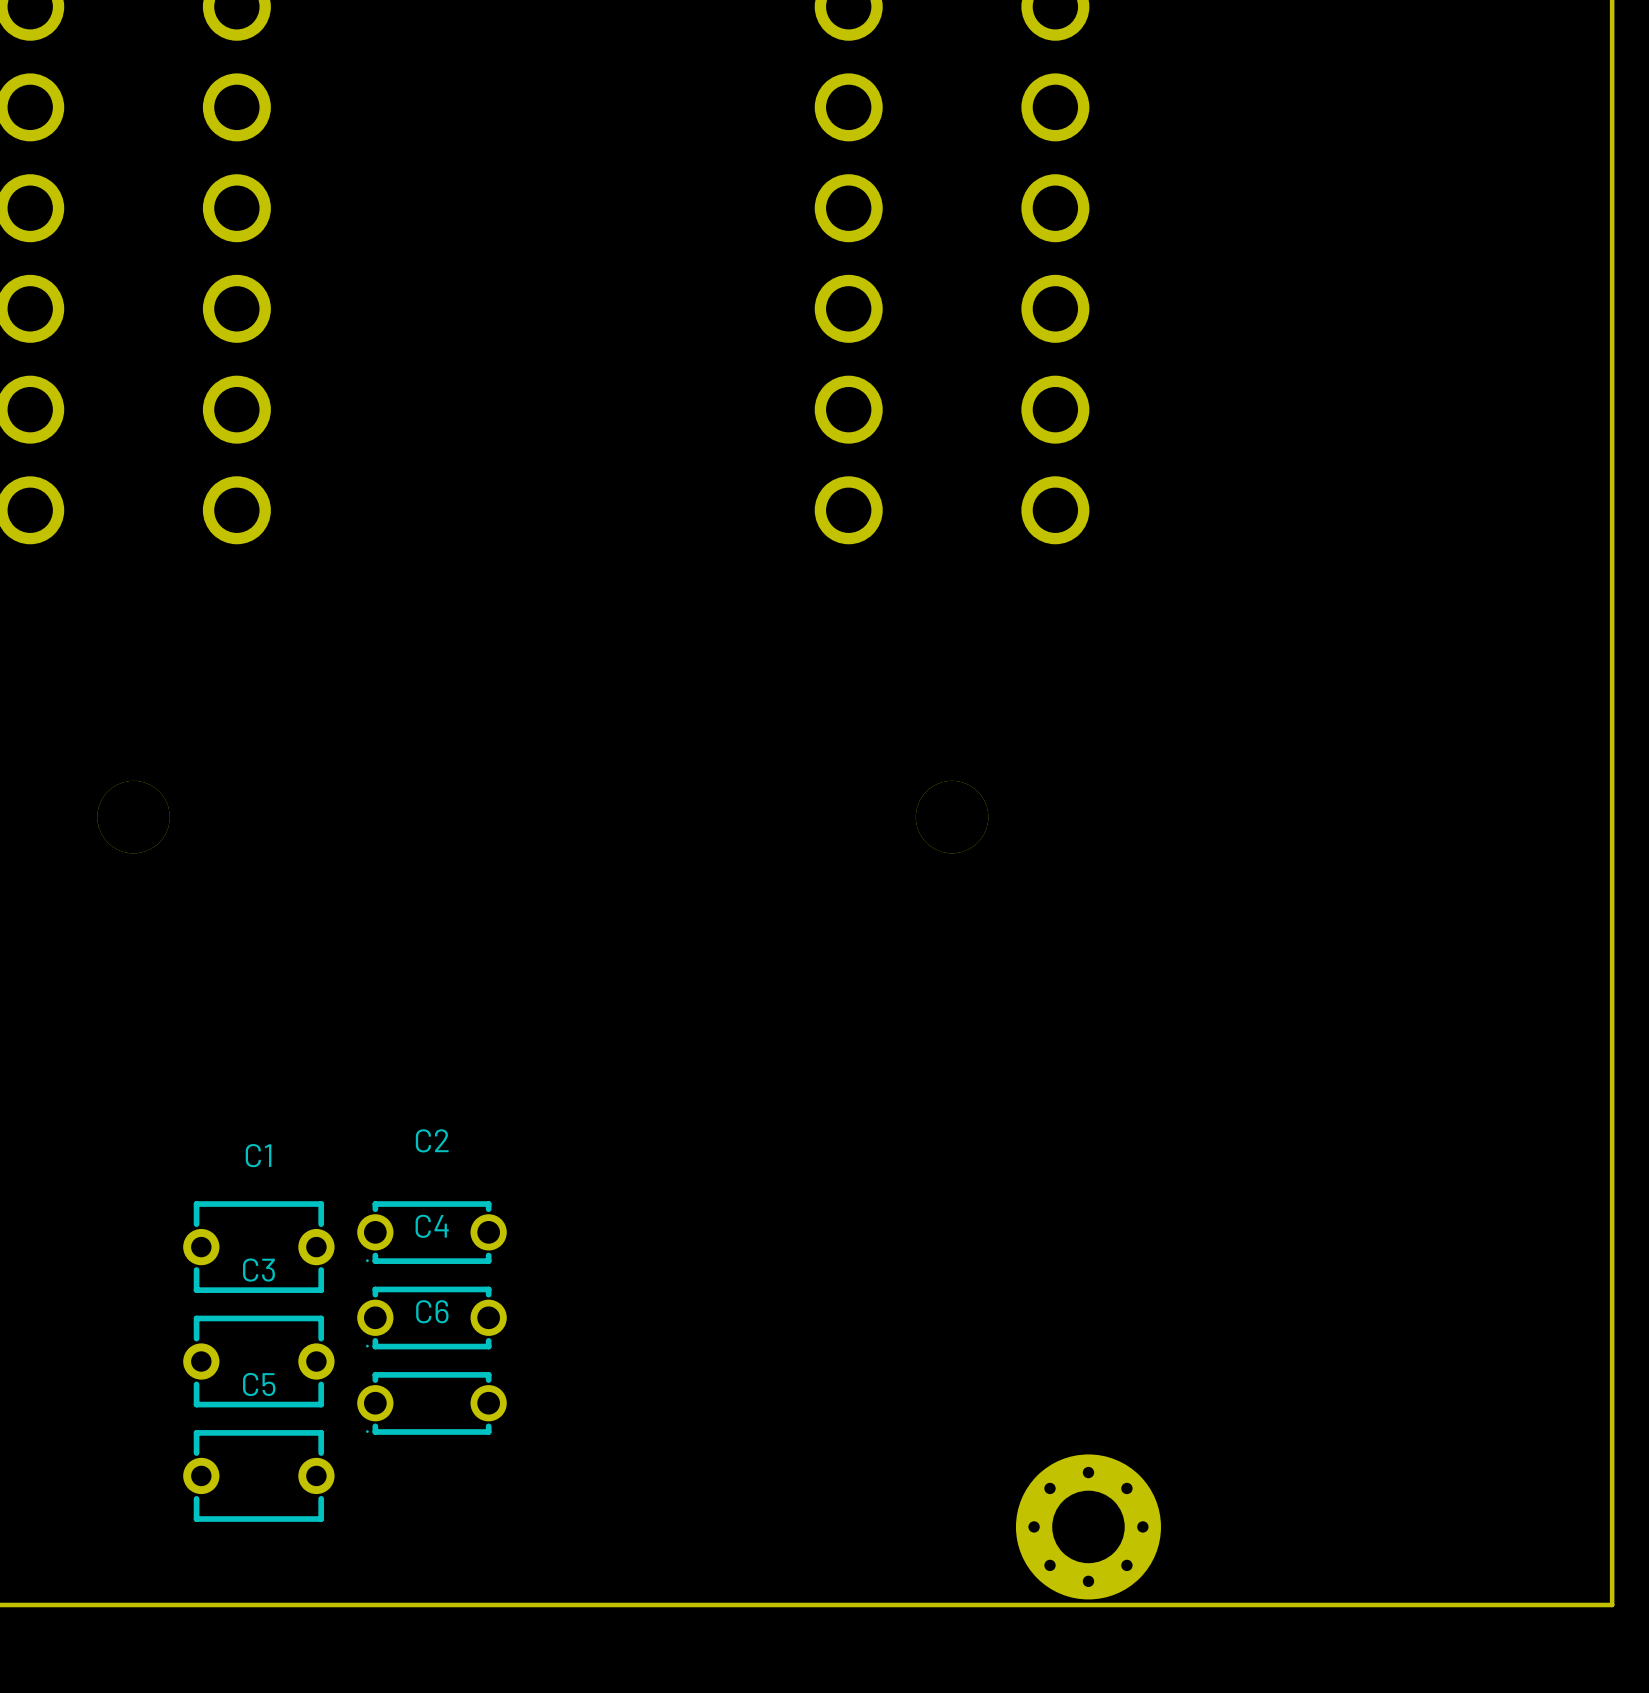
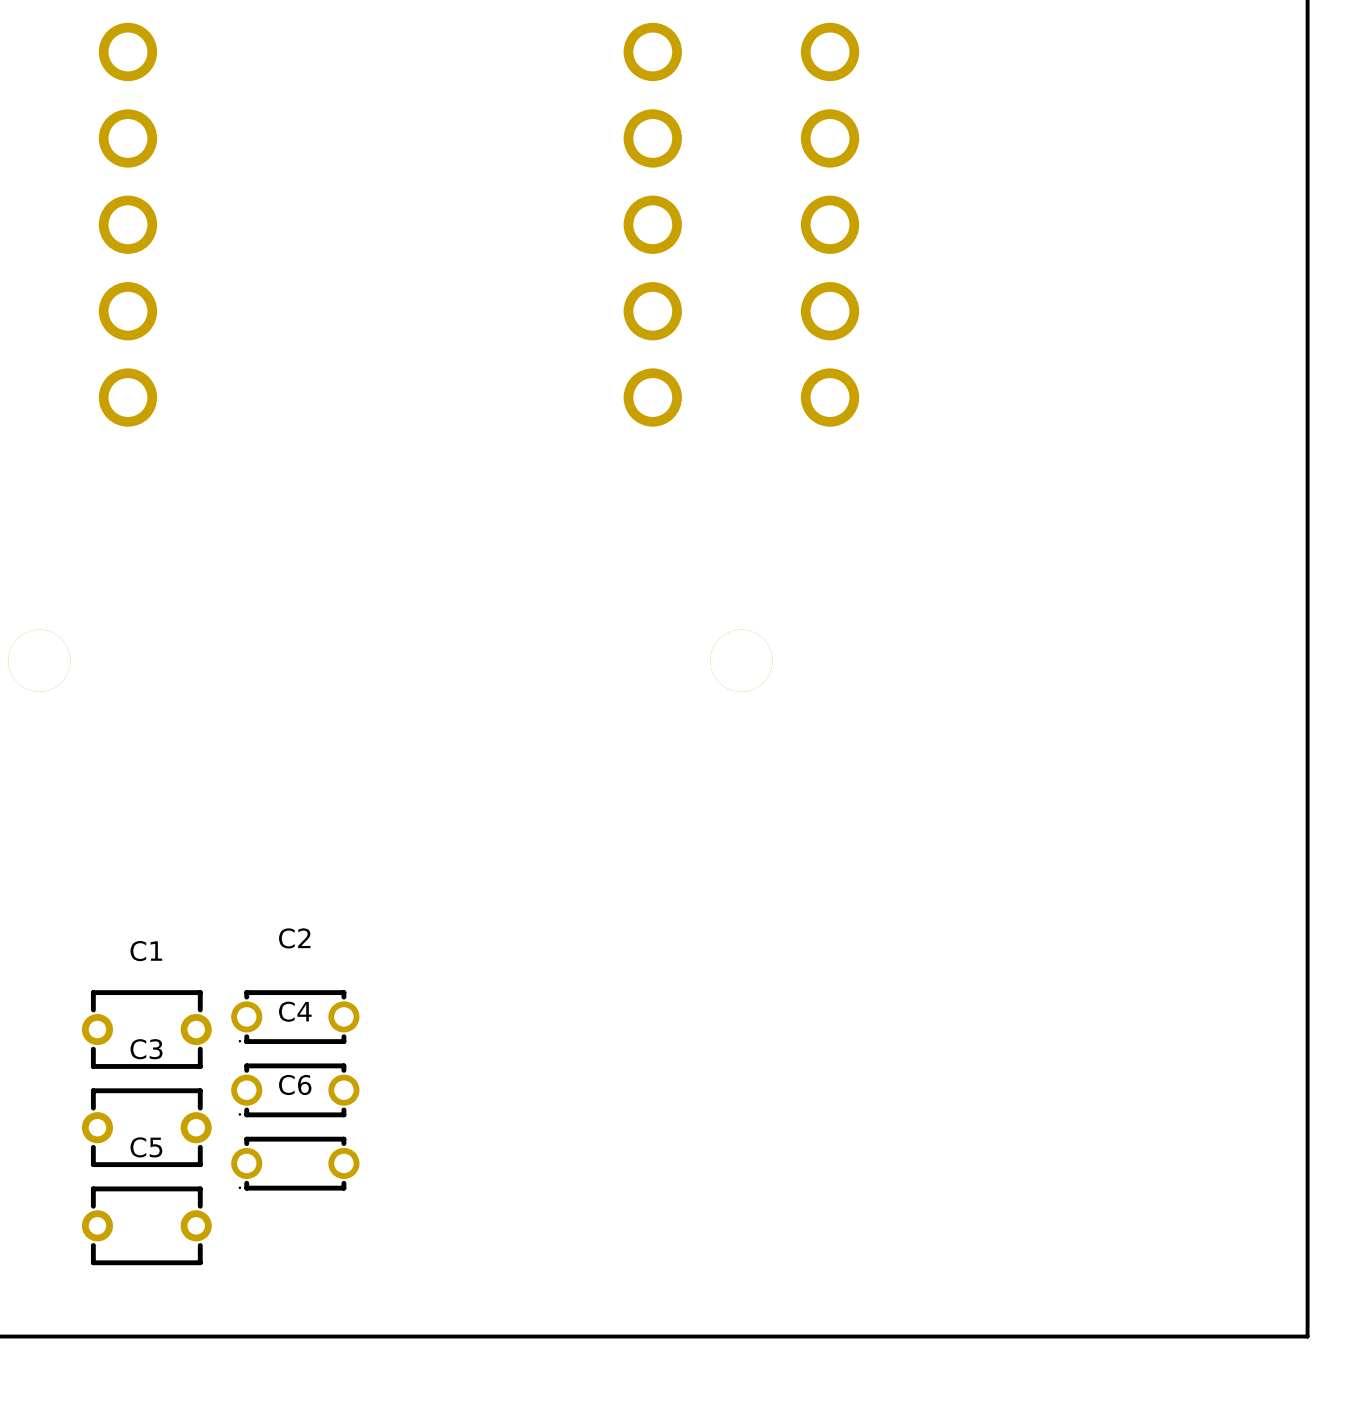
part: (1088, 1526) -> none

